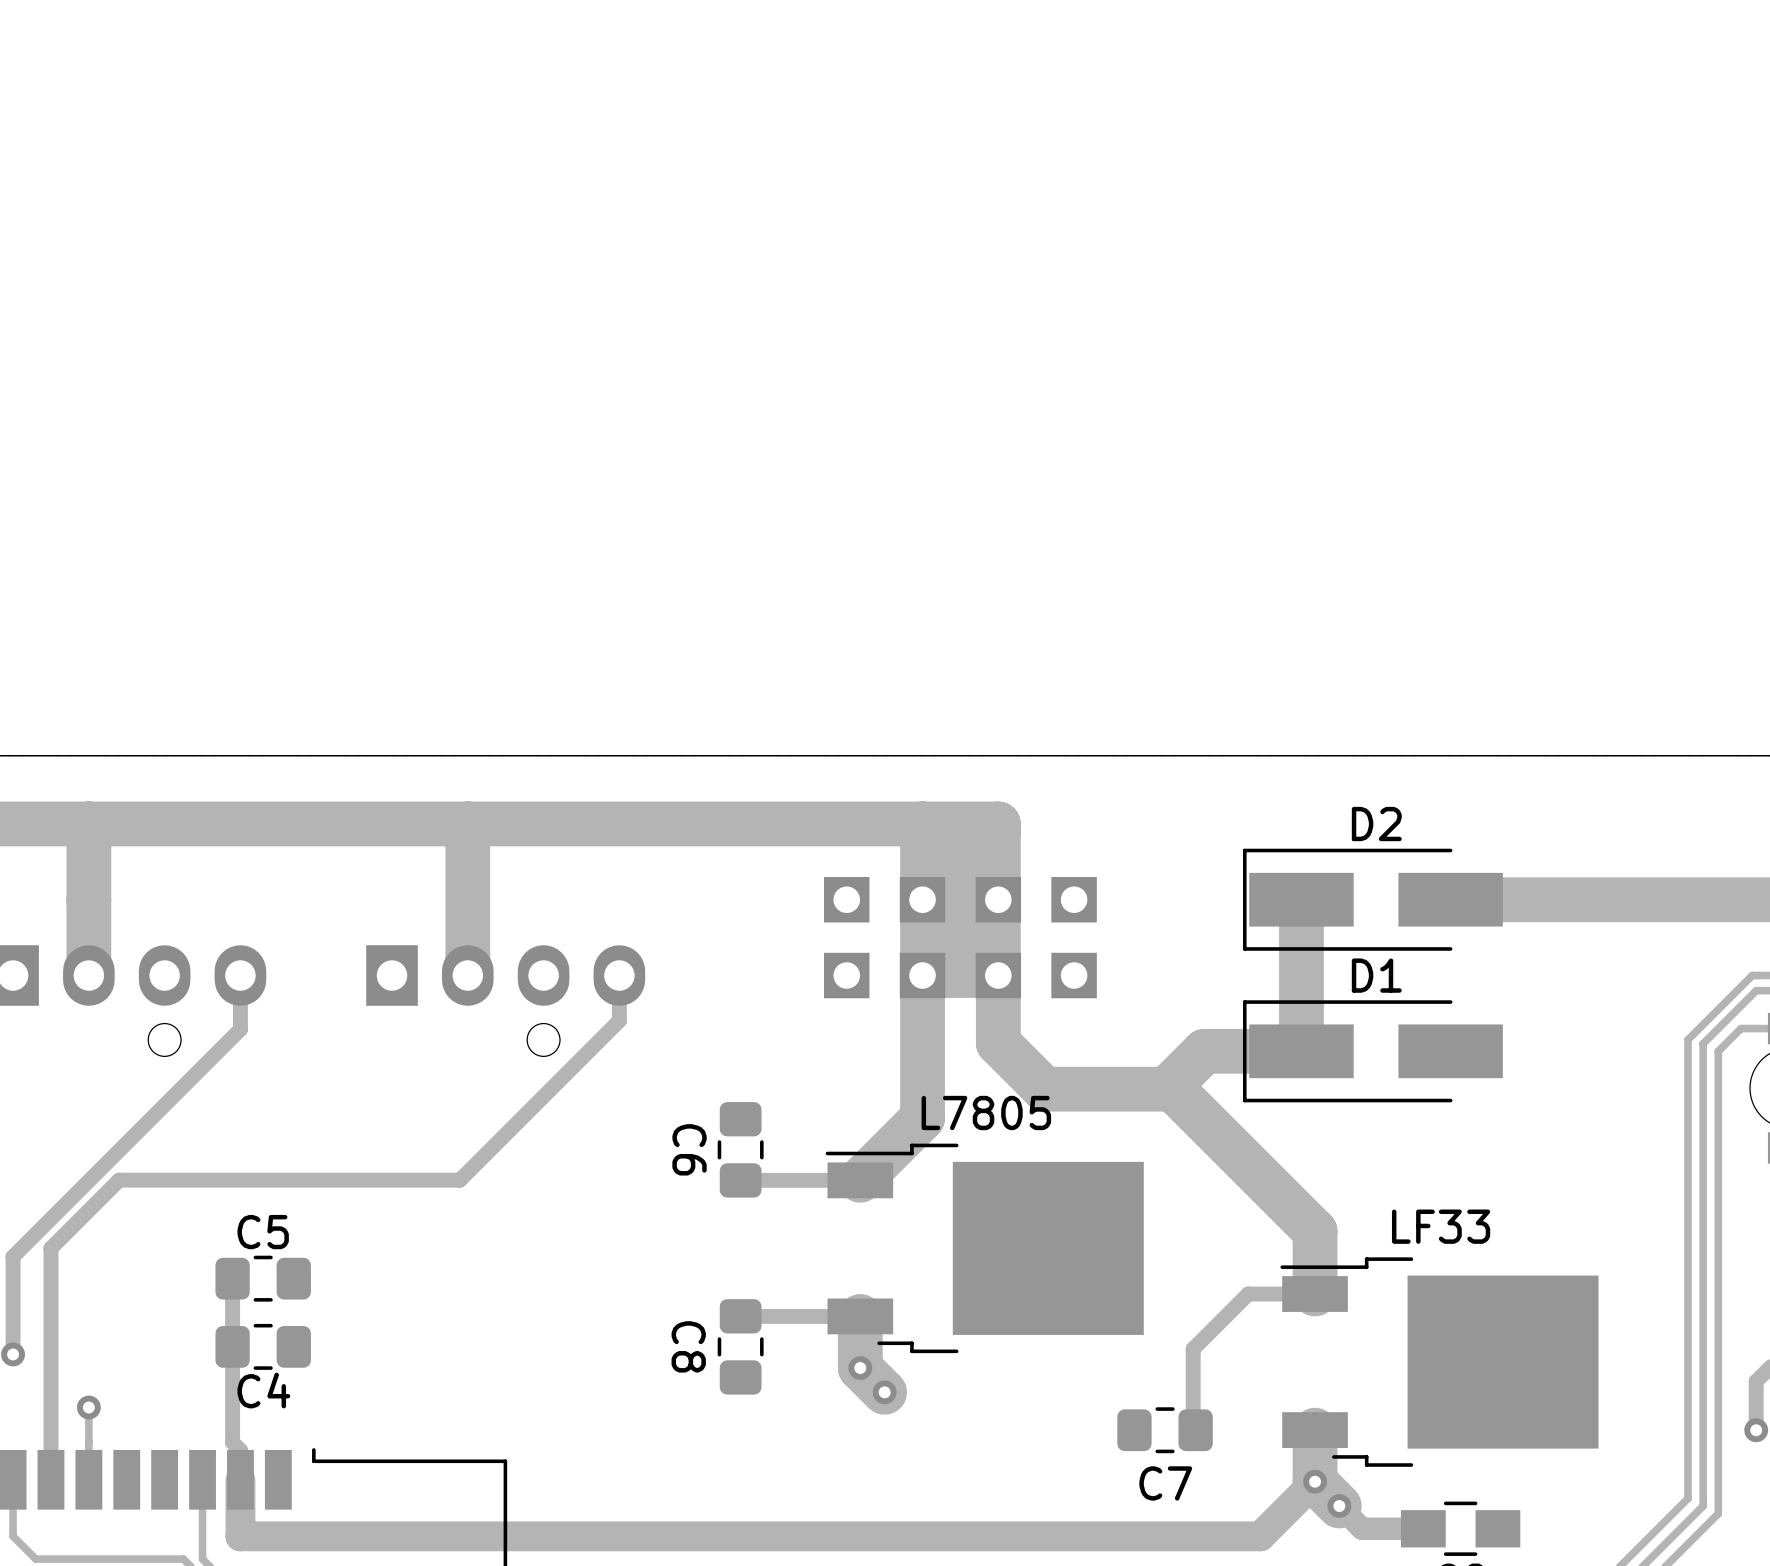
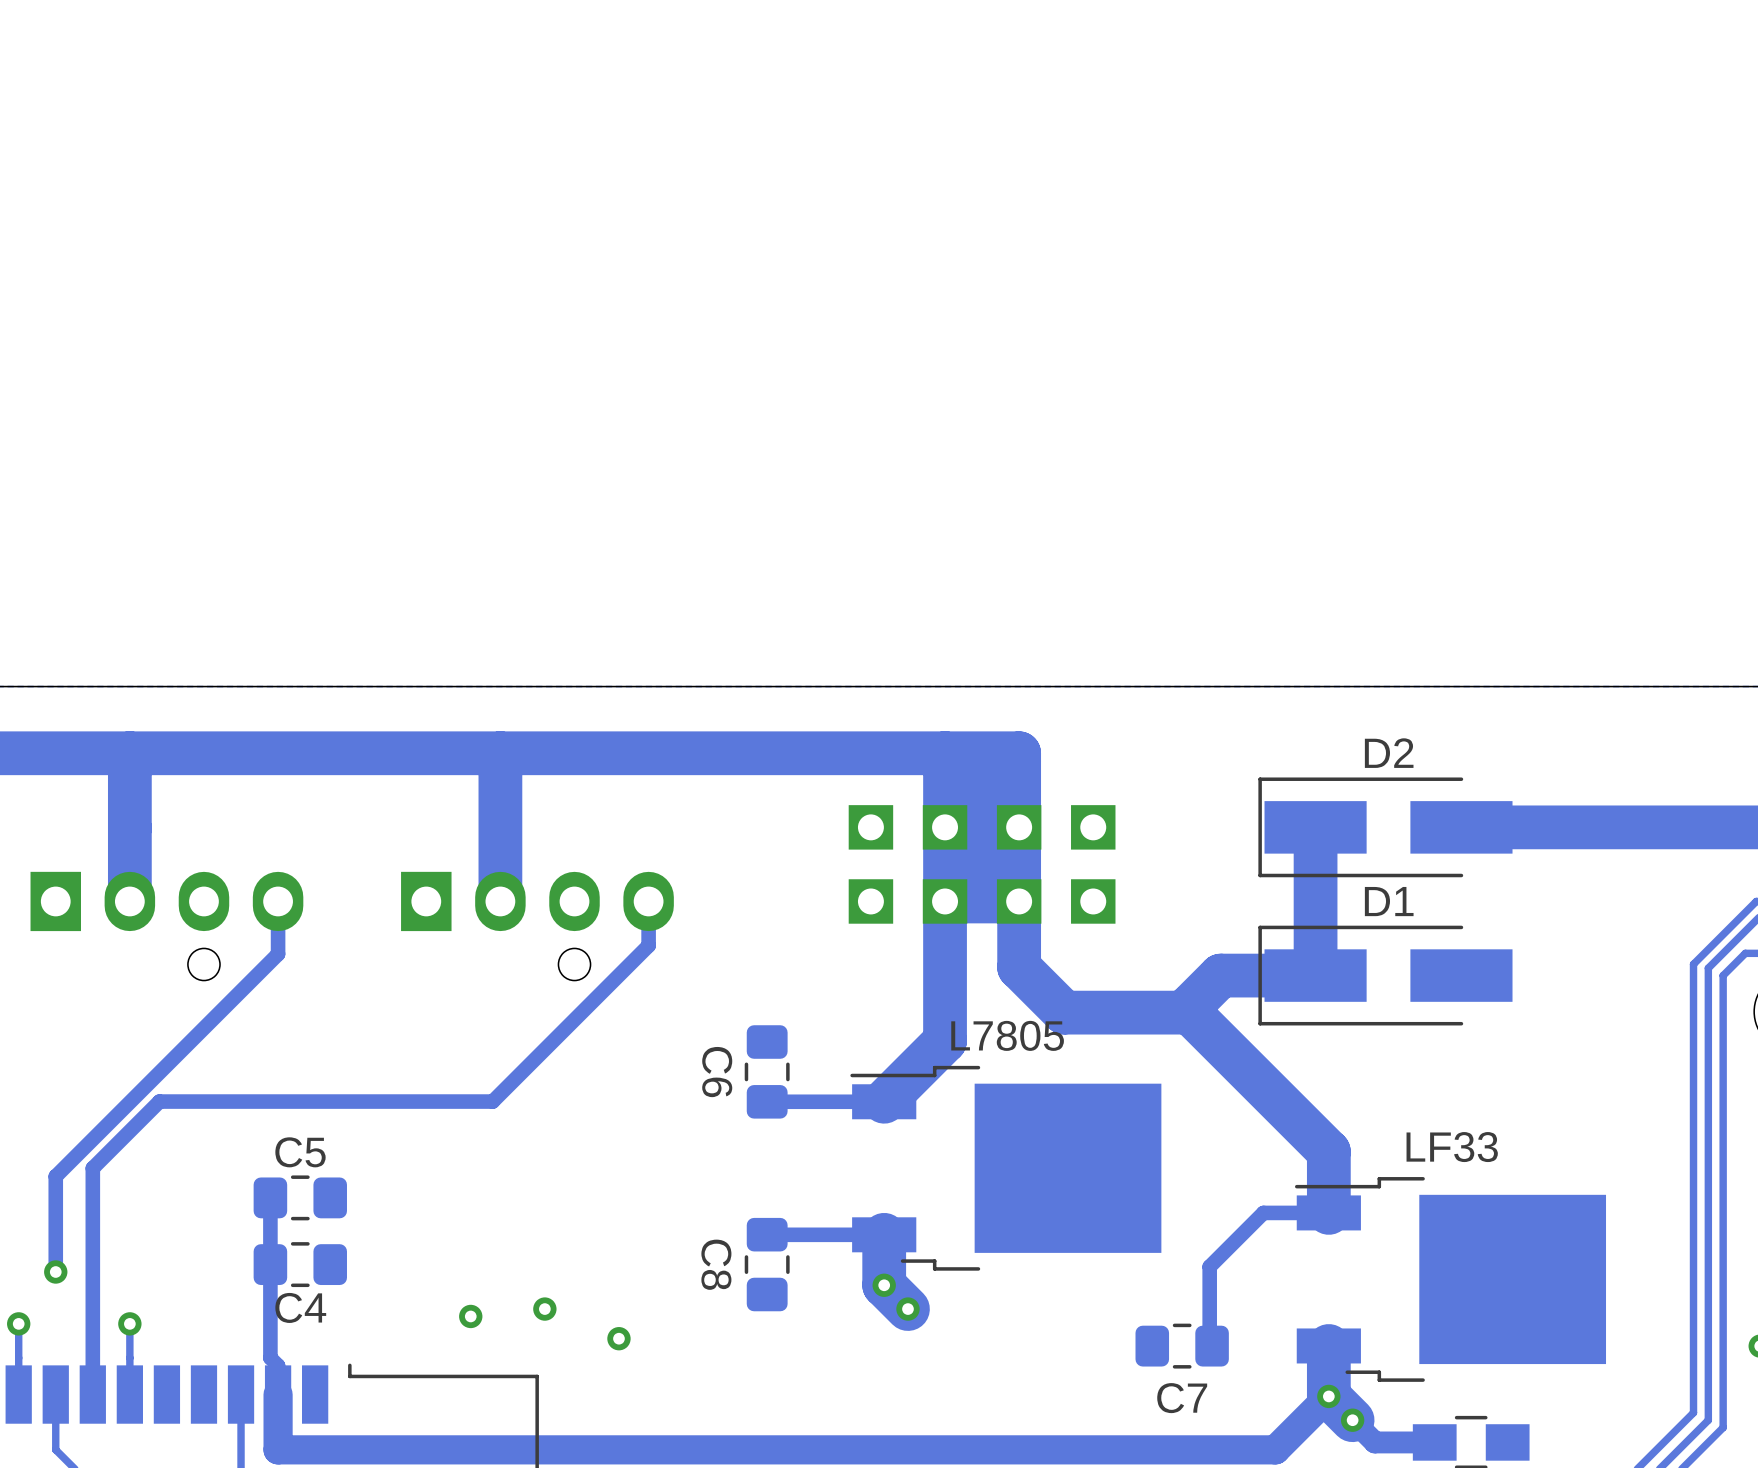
via: none -> (544, 1309)
via: none -> (470, 1316)
via: none -> (618, 1338)

